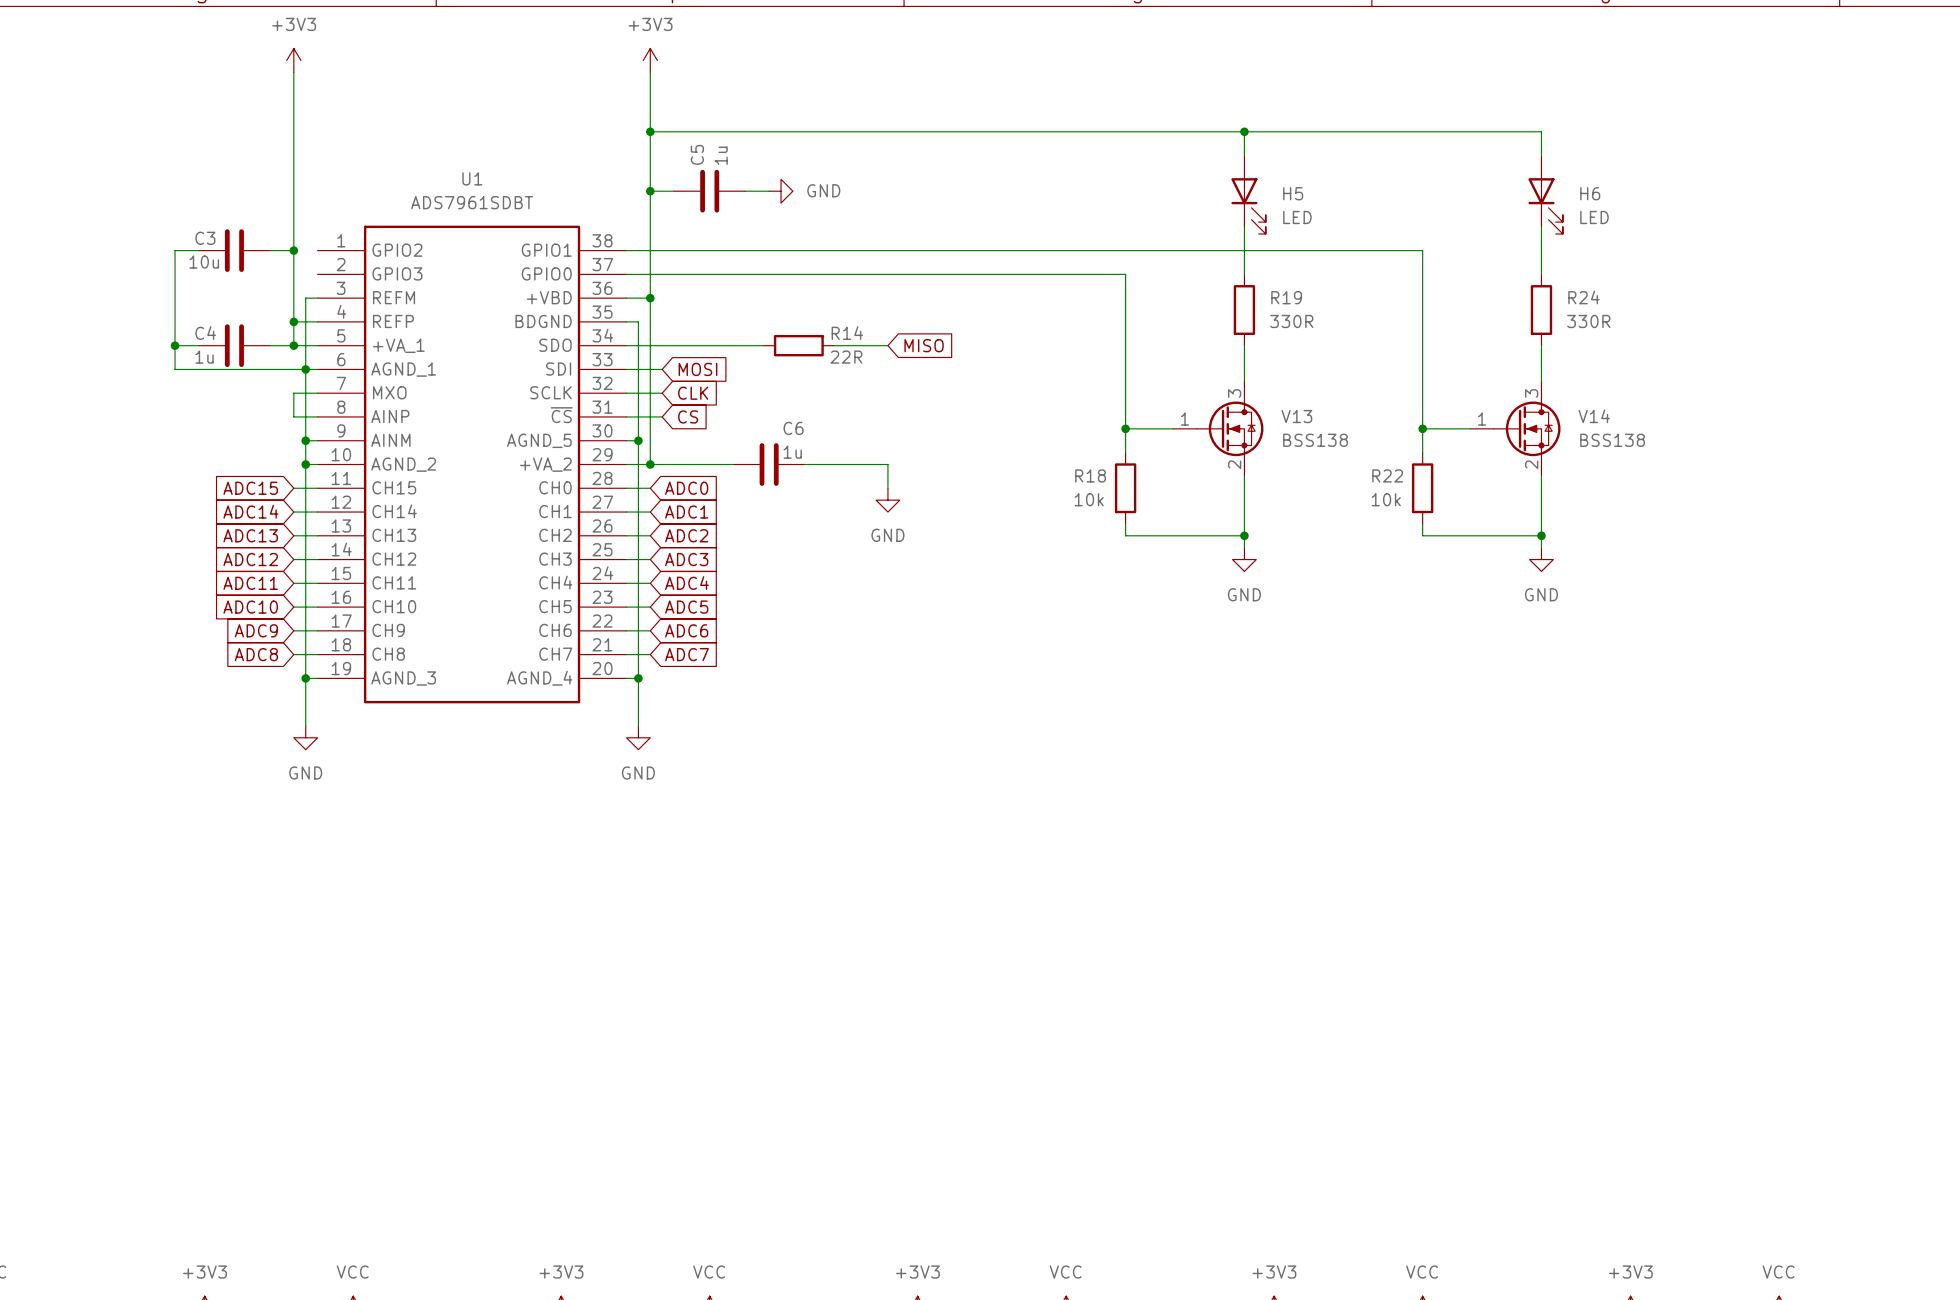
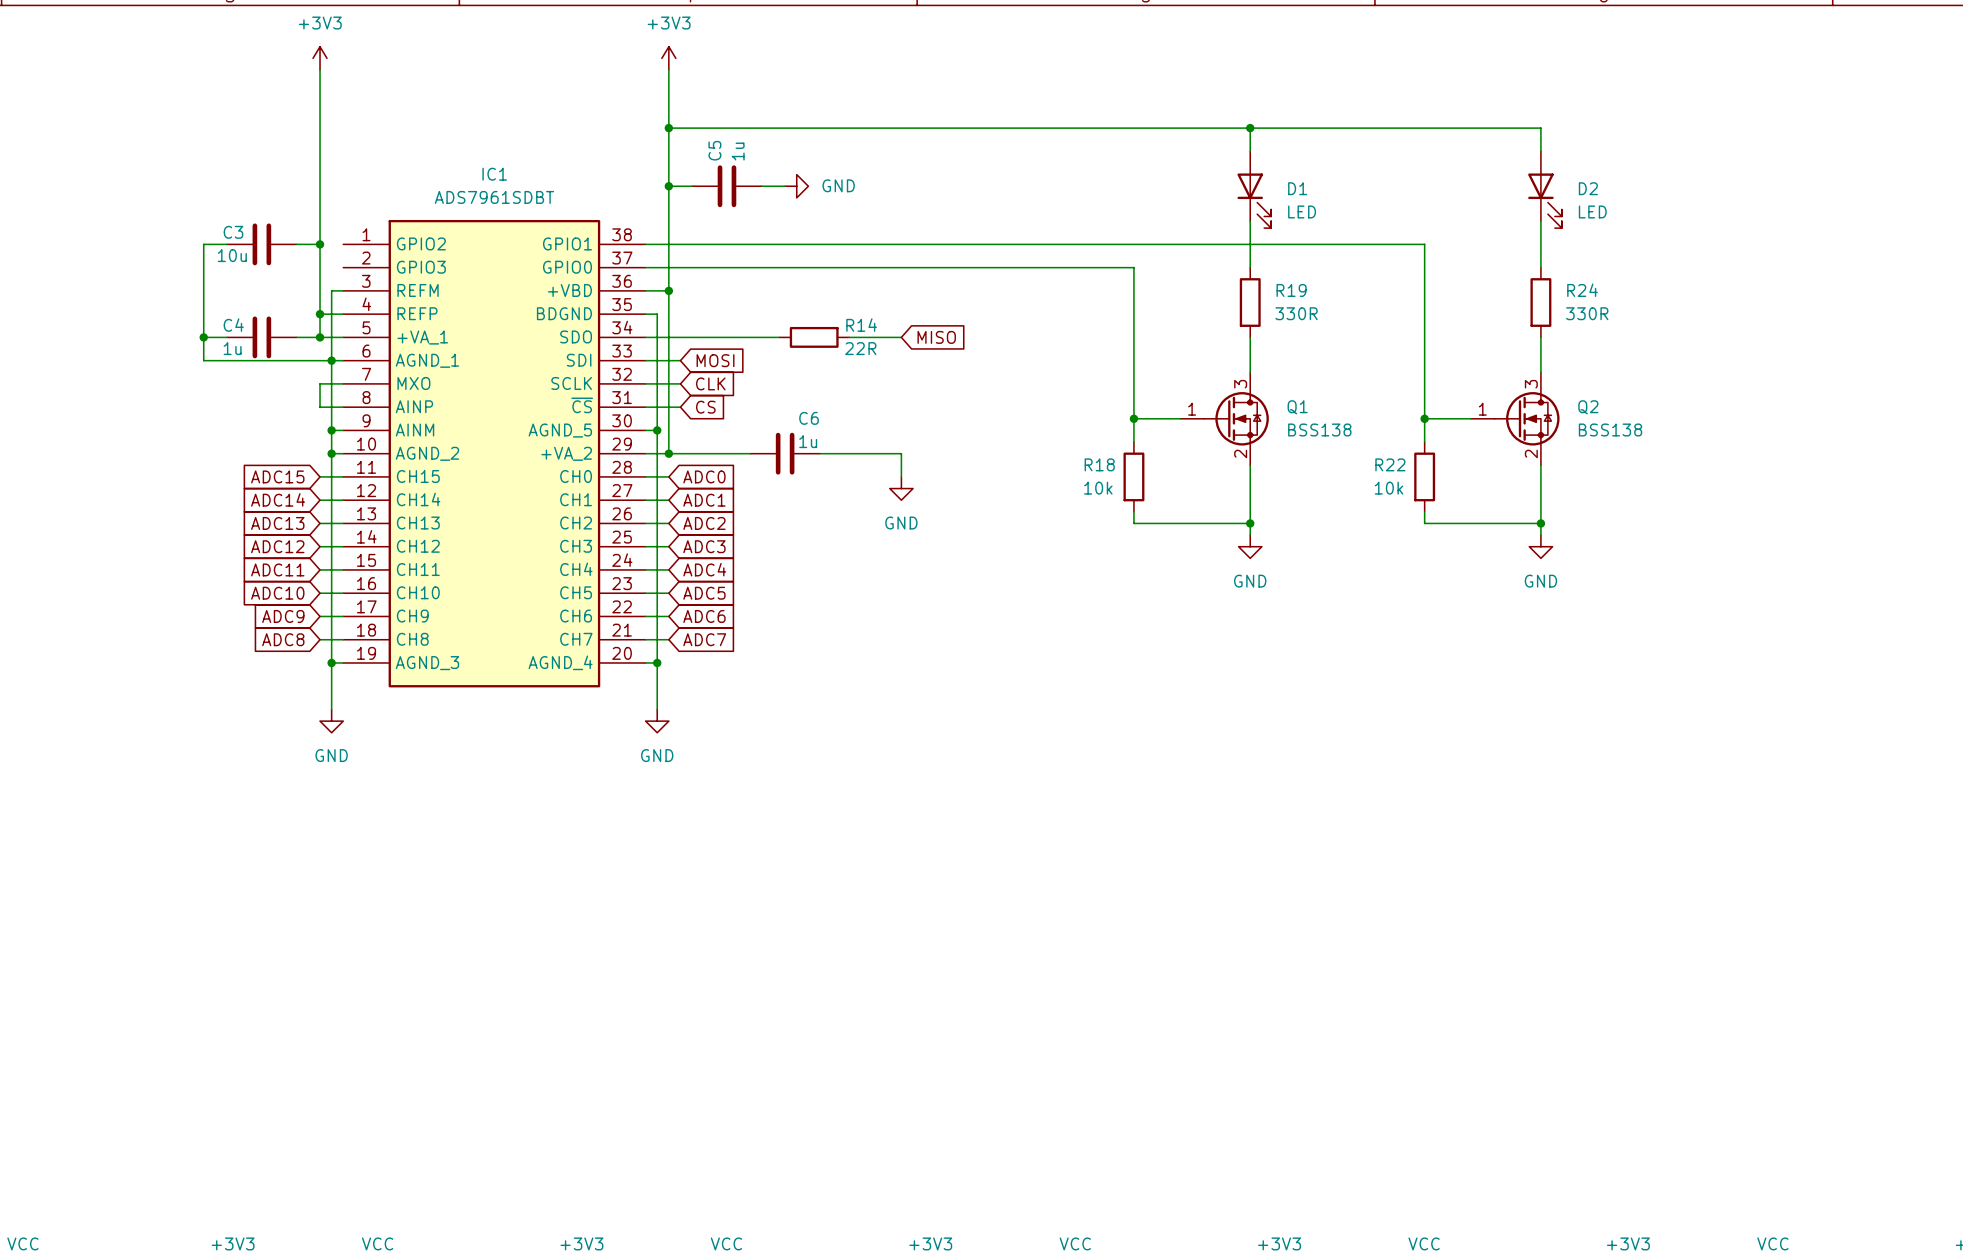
U1 name: U1 (472, 178) -> IC1 (494, 174)
H5 name: H5 (1293, 193) -> D1 (1297, 188)
H6 name: H6 (1590, 193) -> D2 (1588, 188)
V13 name: V13 (1296, 416) -> Q1 (1297, 407)
V14 name: V14 (1594, 416) -> Q2 (1588, 407)

